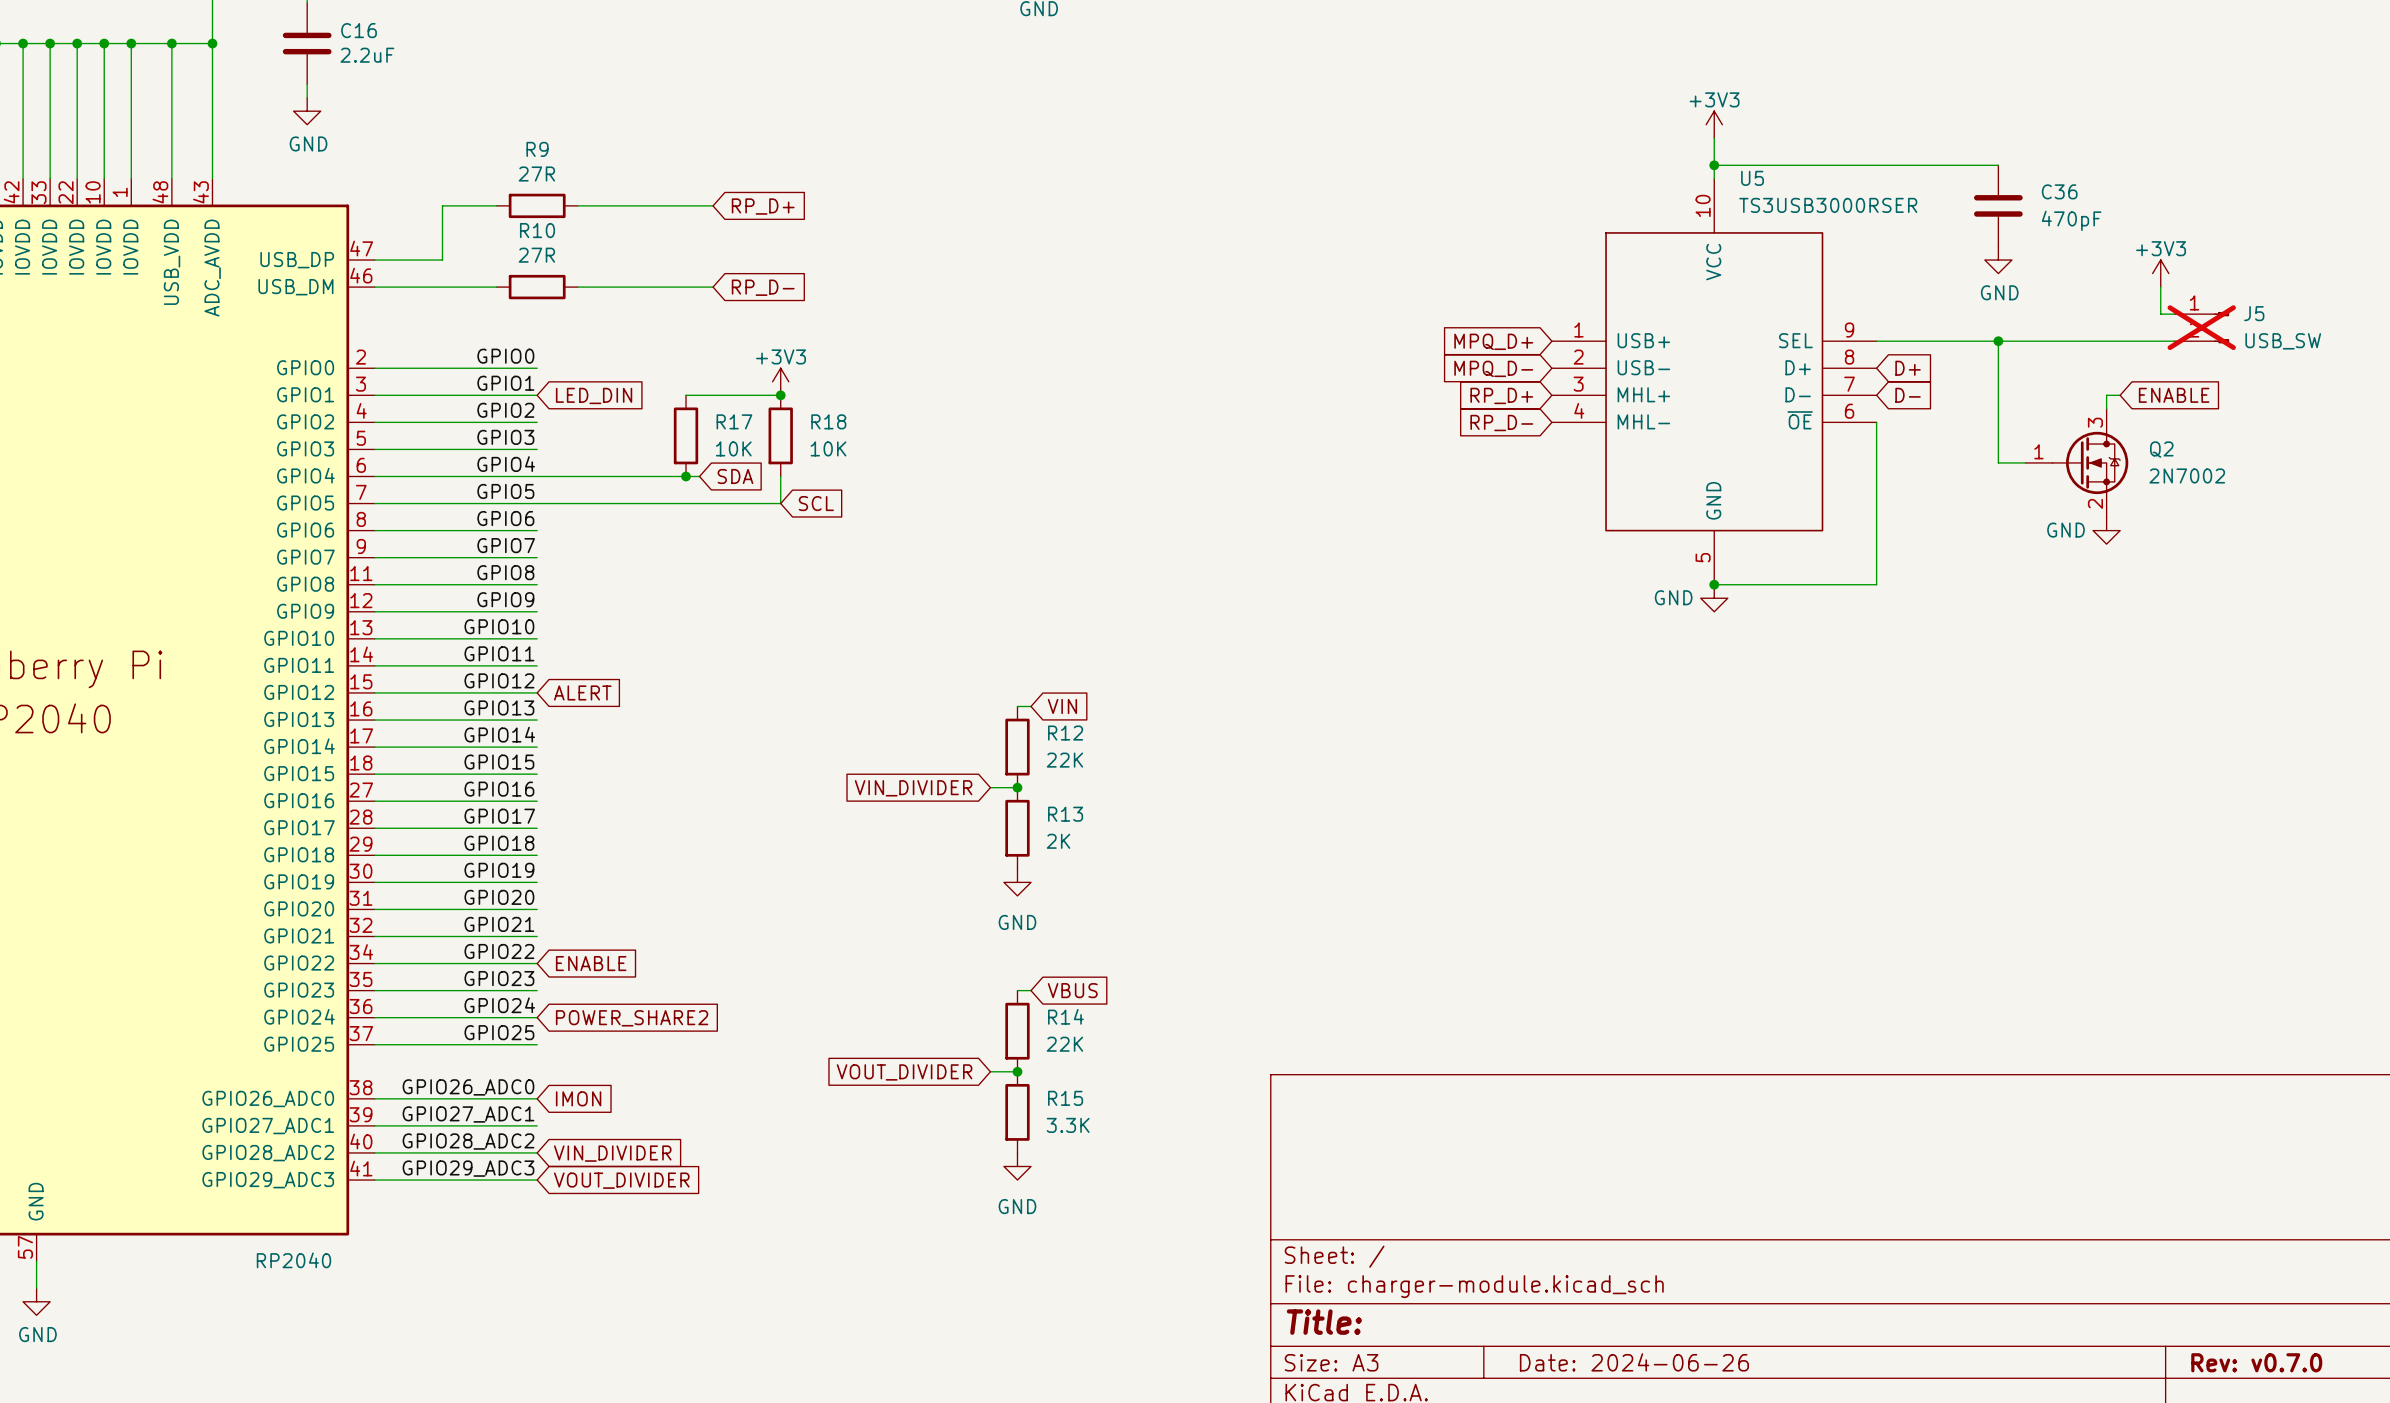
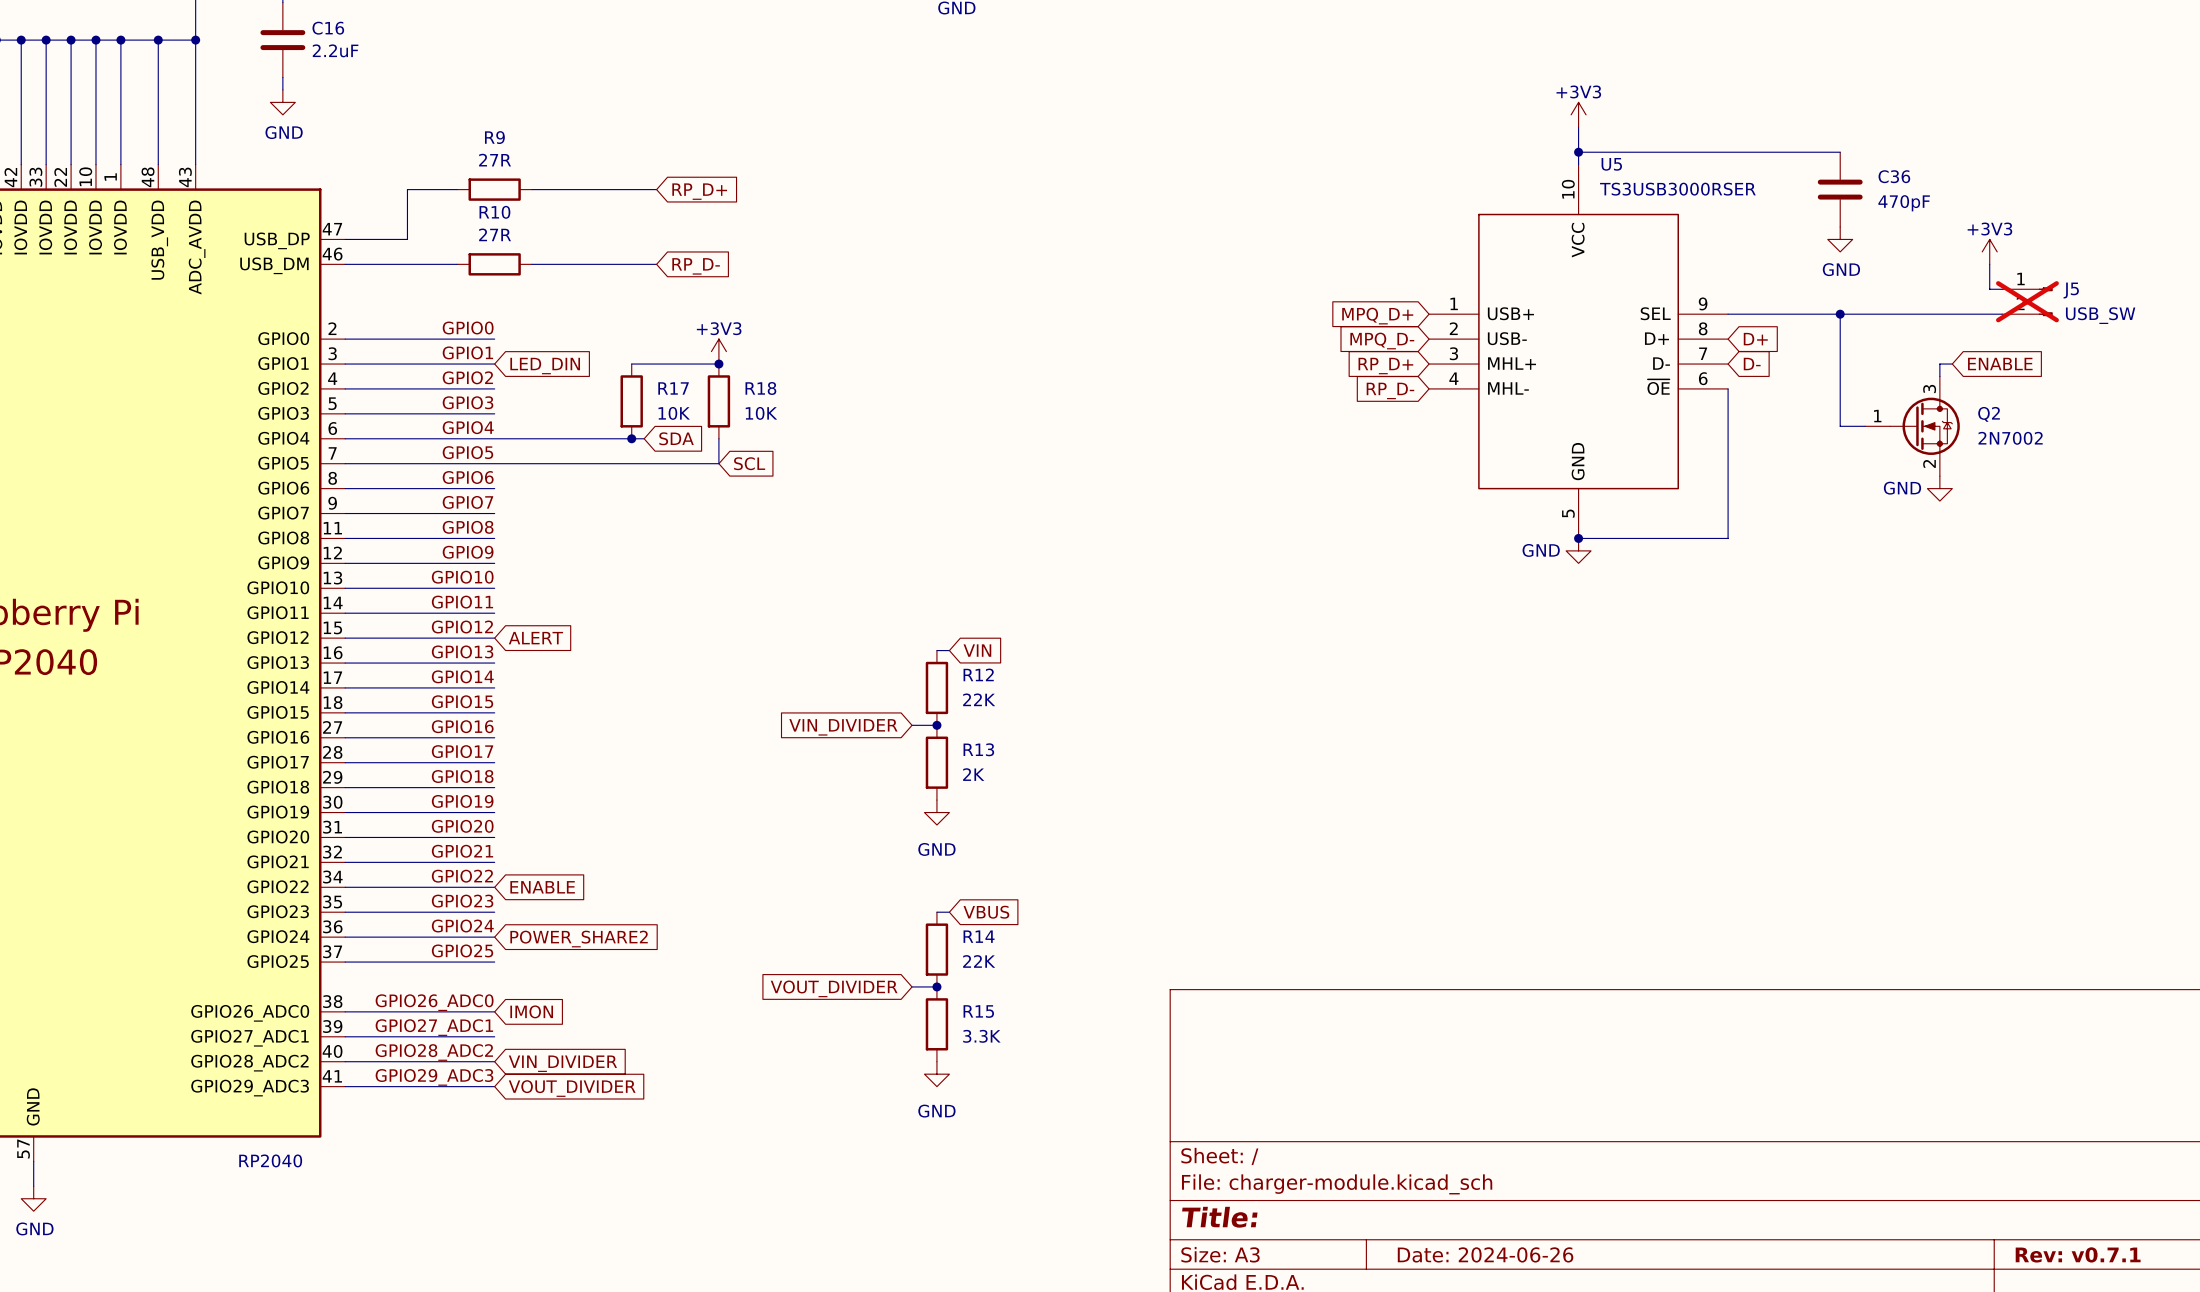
title block: Rev: v0.7.0 (2256, 1362) -> Rev: v0.7.1 (2078, 1254)

